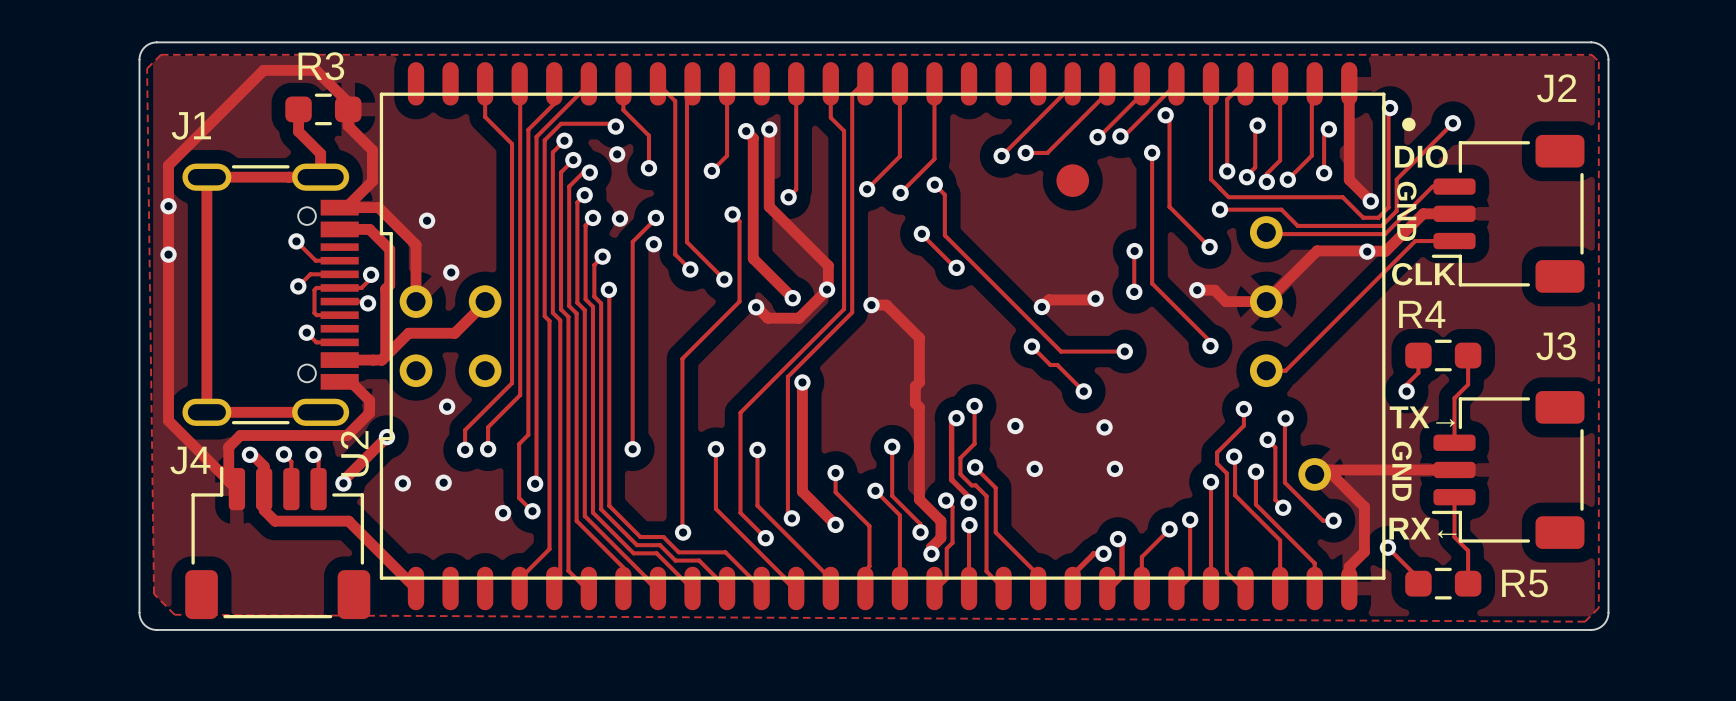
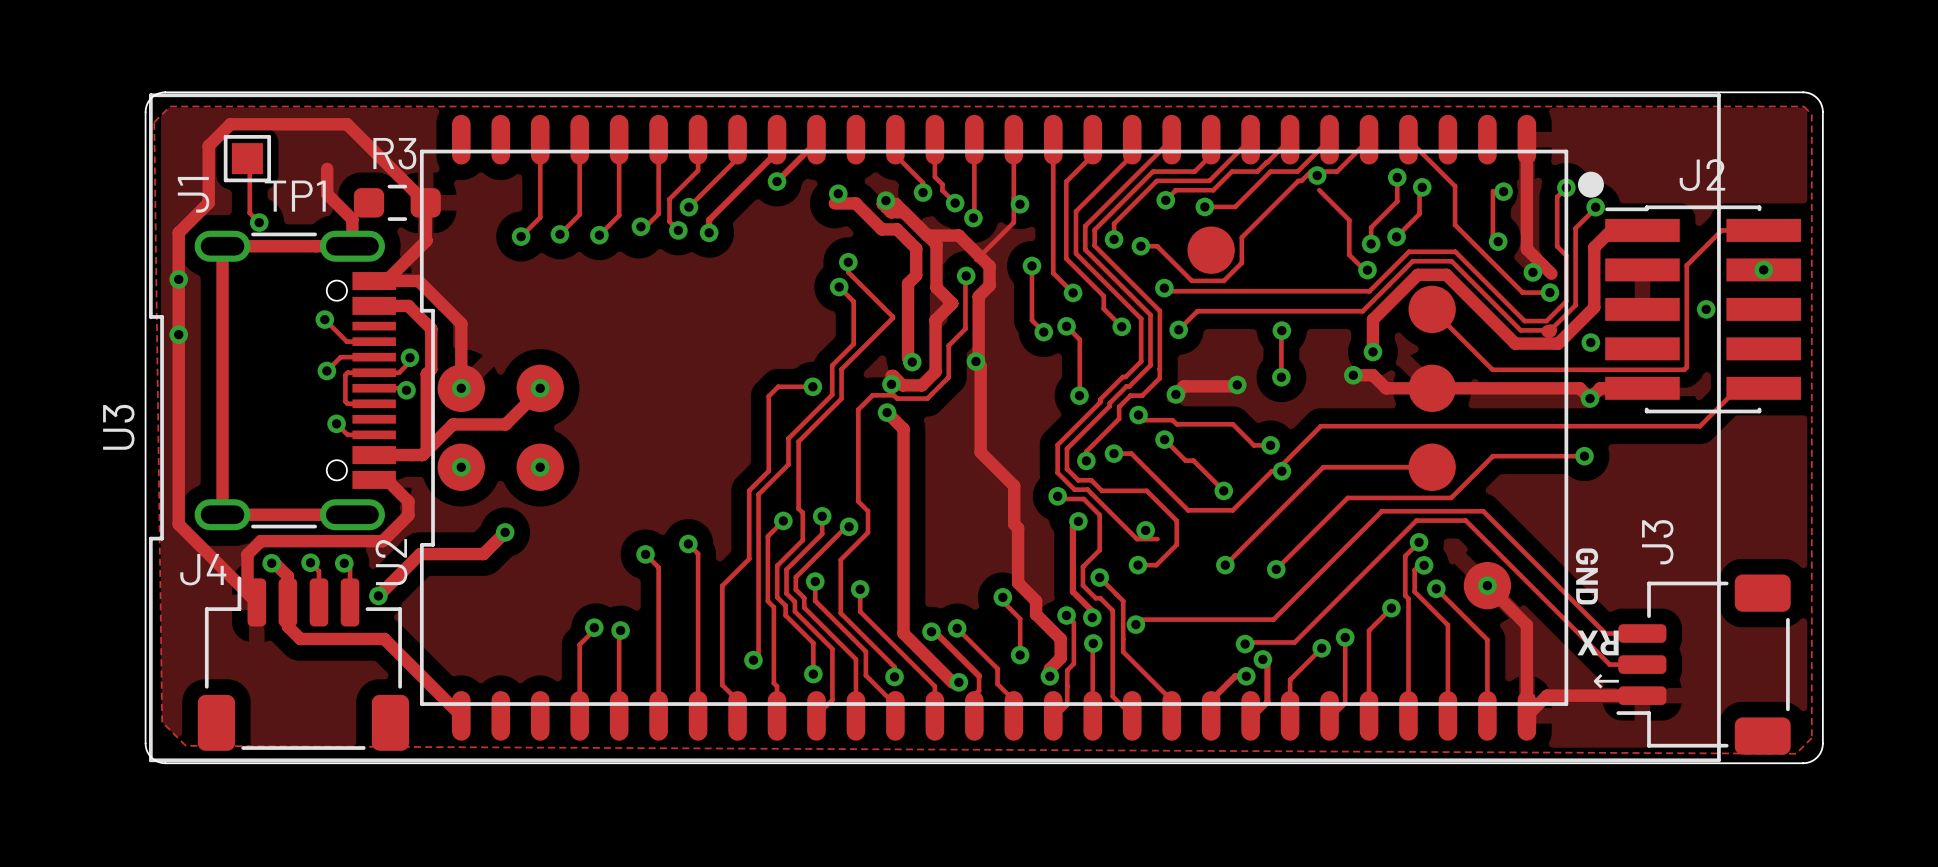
U2 footprint: [379, 62, 1386, 611] -> [419, 114, 1569, 741]
track: (263, 70) (194, 139) -> (287, 124) (230, 124) (208, 146) (208, 202)
track: (657, 83) (675, 101) (675, 254) (690, 269) -> (737, 139) (737, 158) (688, 207)
track: (692, 83) (687, 89) (687, 242) (724, 279) -> (777, 139) (777, 152) (709, 219) (709, 232)
track: (865, 83) (862, 83) (852, 94) (852, 312) (787, 376) (787, 514) (791, 518) -> (974, 139) (973, 218)
track: none -> (1092, 139) (1092, 155) (1066, 181) (1066, 258) (1103, 296) (1103, 308) (1121, 326)
track: none -> (1171, 139) (1085, 226) (1085, 249) (1150, 314) (1150, 365) (1109, 403) (1109, 406) (1066, 448) (1066, 468) (1078, 480) (1091, 480) (1101, 490) (1146, 490) (1176, 520) (1176, 544) (1156, 565) (1138, 565)
track: (1107, 83) (1107, 93) (1047, 152) (1025, 152) -> (1250, 139) (1209, 180) (1156, 180) (1114, 223) (1114, 239)
track: (1141, 83) (1141, 94) (1097, 137) -> (1290, 139) (1257, 171) (1231, 171) (1213, 190) (1175, 190) (1165, 200)
track: (1211, 83) (1211, 179) (1228, 197) (1342, 197) (1363, 217) (1378, 217) (1388, 207) (1390, 108) -> (1369, 139) (1337, 171) (1310, 171) (1301, 180) (1298, 180) (1241, 237) (1241, 262) (1223, 280) (1191, 280) (1157, 246) (1140, 246)
track: (1245, 83) (1242, 83) (1227, 99) (1227, 171) -> (1408, 139) (1455, 186) (1455, 224) (1522, 292) (1549, 292)
track: (1280, 83) (1280, 160) (1266, 173) (1266, 181) -> none
track: (1314, 83) (1311, 86) (1311, 155) (1287, 179) -> none
track: (588, 84) (536, 136) (535, 483) -> (658, 140) (658, 213) (638, 233)
track: (1072, 84) (1001, 156) -> (1211, 140) (1211, 155) (1194, 171) (1153, 171) (1094, 229) (1094, 245) (1159, 311) (1159, 378) (1142, 395) (1130, 395) (1119, 407) (1119, 418) (1086, 451) (1086, 460)
track: (727, 85) (727, 155) (711, 170) -> (816, 142) (777, 181)
track: (519, 93) (520, 395) (488, 427) (488, 449) -> (579, 150) (579, 214) (559, 234)
track: (796, 97) (796, 189) (788, 197) -> (895, 155) (923, 182) (923, 192)
track: none -> (1132, 155) (1076, 211) (1076, 253) (1141, 318) (1141, 361) (1100, 399) (1100, 402) (1057, 444) (1057, 472) (1074, 489) (1087, 489) (1136, 539) (1157, 539)
track: none -> (247, 158) (249, 160) (249, 213) (259, 222)
TP1: none -> (247, 158)
track: (348, 102) (348, 125) (372, 150) (372, 181) (346, 207) -> (383, 160) (425, 202) (426, 240) (386, 281)
track: (554, 103) (528, 129) (528, 434) (519, 444) (519, 498) (532, 511) -> (619, 162) (619, 215) (599, 235)
via position: (1390, 108) -> (1566, 187)
R3 position: (323, 109) -> (397, 202)
track: (623, 110) (648, 135) (648, 168) -> (698, 169) (669, 199) (669, 221) (678, 230)
track: (1148, 111) (1123, 136) (1120, 136) -> (1297, 171) (1270, 171) (1235, 206) (1204, 206)
track: (1165, 115) (1169, 119) (1169, 206) (1209, 246) -> none
track: (830, 116) (844, 130) (844, 309) (740, 412) (740, 512) (765, 538) -> (934, 176) (942, 184) (942, 190) (955, 203)
track: none -> (1397, 177) (1397, 201) (1371, 227) (1371, 243)
via: none -> (1397, 177)
track: (485, 117) (512, 143) (512, 383) (465, 430) (465, 449) -> (540, 177) (540, 217) (521, 236)
via: none -> (777, 181)
track: (1452, 123) (1396, 179) (1396, 210) (1381, 225) (1297, 225) (1281, 209) (1219, 209) -> none
via: (1452, 123) -> none
J1 name rotation: 0° (191, 125) -> 90° counterclockwise (193, 194)
track: (615, 126) (612, 123) (561, 123) (544, 140) (544, 316) (549, 321) (549, 549) (519, 578) -> (596, 628) (579, 644) (579, 705)
via: (615, 126) -> none
track: none -> (1566, 187) (1557, 196) (1557, 246) (1566, 255) (1566, 301) (1546, 321) (1524, 321) (1455, 251) (1409, 251) (1369, 291) (1167, 291) (1164, 288)
track: none -> (1319, 190) (1349, 220) (1349, 254) (1364, 270) (1367, 270)
track: none -> (1492, 190) (1492, 235) (1496, 238)
track: (769, 129) (769, 206) (828, 265) (828, 288) (798, 318) (767, 318) (756, 307) -> none
via position: (769, 129) -> (885, 200)
track: (1328, 129) (1324, 134) (1324, 173) -> none
via: none -> (923, 192)
track: (746, 131) (753, 138) (753, 258) (792, 298) -> none
J2 footprint: [1431, 134, 1585, 293] -> [1605, 205, 1801, 414]
via: (1120, 136) -> none
via: (1097, 137) -> none
track: none -> (834, 203) (855, 203) (881, 229) (897, 229) (916, 248) (916, 275) (908, 283) (908, 357) (912, 362)
via: none -> (955, 203)
track: (564, 140) (552, 152) (552, 312) (560, 320) (560, 572) (554, 578) -> (620, 630) (619, 705)
via: (564, 140) -> none
via: none -> (1020, 204)
via: none -> (688, 207)
via: none -> (1204, 206)
via: none -> (1595, 207)
track: none -> (904, 212) (891, 212) (885, 207) (885, 200) (882, 204) (895, 204) (936, 244) (936, 287) (952, 303) (935, 320) (935, 371) (921, 385) (902, 385) (891, 375)
track: (1255, 148) (1255, 167) (1246, 177) -> (1419, 213) (1396, 236)
via: none -> (973, 218)
via position: (1025, 152) -> (1165, 200)
track: (1152, 152) (1152, 283) (1210, 341) (1210, 346) -> none
via: (1152, 152) -> none
via: (617, 154) -> none
via: none -> (259, 222)
via position: (1001, 156) -> (1114, 239)
text: DIO (1421, 156) -> none
track: (934, 159) (900, 192) -> (1053, 225) (1053, 273) (1073, 292)
track: (573, 160) (561, 172) (561, 309) (568, 316) (568, 570) (586, 588) (588, 588) -> (645, 554) (658, 567) (658, 715)
via: none -> (678, 230)
track: none -> (1642, 230) (1611, 230) (1594, 247) (1594, 307) (1558, 343) (1515, 343) (1446, 274) (1417, 274) (1372, 319) (1372, 351)
via: none -> (709, 232)
via: none -> (559, 234)
via: none -> (599, 235)
via: none -> (521, 236)
via: (648, 168) -> none
via: none -> (1396, 236)
via: (711, 170) -> none
via: (1227, 171) -> none
track: (589, 172) (583, 172) (569, 186) (569, 306) (576, 313) (576, 520) (623, 567) -> (688, 544) (698, 553) (698, 692)
via: (589, 172) -> none
via: none -> (1371, 243)
via: none -> (1140, 246)
via: (1246, 177) -> none
via: (1287, 179) -> none
via: (1266, 181) -> none
track: (934, 184) (944, 194) (944, 235) (1039, 329) -> (1138, 415) (1143, 420) (1172, 420)
via: (934, 184) -> none
track: (1454, 186) (1432, 186) (1385, 234) (1267, 234) -> (1763, 230) (1721, 230) (1686, 265) (1686, 367) (1684, 369) (1492, 369) (1434, 311)
via position: (867, 189) -> (966, 275)
track: none -> (848, 262) (848, 272) (892, 317) (841, 369) (841, 398) (798, 441) (798, 508) (802, 512) (802, 540) (777, 565) (777, 597) (785, 605) (785, 615) (813, 643) (813, 674)
via: none -> (848, 262)
via position: (900, 192) -> (1031, 265)
track: none -> (1031, 265) (1031, 320) (1043, 332)
track: (584, 195) (577, 202) (577, 302) (584, 310) (584, 516) (655, 588) (657, 588) -> none
via: (584, 195) -> none
via: (788, 197) -> none
via: none -> (1763, 269)
via position: (1370, 201) -> (1532, 272)
track: none -> (966, 275) (965, 328) (948, 345) (948, 377) (927, 398) (897, 398) (893, 395) (872, 395) (858, 409) (858, 501) (868, 511) (868, 532) (840, 559) (840, 613) (894, 666) (894, 676)
via position: (1219, 209) -> (1367, 270)
text: GND (1406, 211) -> none
track: none -> (839, 287) (853, 301) (853, 344) (832, 365) (832, 394) (788, 438) (788, 464) (758, 494) (758, 655) (753, 660)
via: none -> (1164, 288)
track: (1454, 213) (1423, 213) (1385, 251) (1370, 251) -> (1595, 207) (1575, 228) (1575, 305) (1550, 330)
track: (732, 214) (739, 221) (739, 301) (682, 358) (683, 532) (678, 531) -> none
via position: (732, 214) -> (839, 287)
track: (592, 217) (585, 225) (585, 299) (592, 306) (592, 512) (633, 553) (656, 553) (692, 588) -> (783, 520) (767, 536) (767, 601) (773, 607) (773, 683) (777, 686) (777, 715)
via: (592, 217) -> none
track: (655, 217) (632, 241) (632, 449) -> none
via: (655, 217) -> none
via: none -> (1549, 292)
via: (619, 218) -> none
via: none -> (1073, 292)
via: (427, 220) -> none
via: none -> (1706, 309)
via: (921, 233) -> none
track: (921, 234) (956, 267) -> none
track: (1454, 241) (1415, 241) (1285, 370) (1266, 370) -> (1225, 565) (1323, 467) (1432, 467)
via: (653, 244) -> none
via position: (1209, 246) -> (1372, 351)
track: none -> (1066, 326) (1079, 339) (1079, 395)
via: none -> (1066, 326)
via: none -> (1121, 326)
track: none -> (1178, 329) (1197, 311) (1362, 311) (1412, 261) (1451, 261) (1520, 330)
via: none -> (1178, 329)
track width: thick (1317, 250) (1370, 250) -> thin (1490, 330) (1550, 330)
track: (1343, 250) (1317, 250) (1266, 301) -> (1642, 388) (1600, 388) (1590, 398) (1579, 388) (1432, 388)
via: (1367, 251) -> none
via: none -> (1043, 332)
track: (602, 256) (594, 264) (594, 296) (601, 303) (601, 509) (637, 545) (660, 545) (675, 560) (699, 560) (727, 588) -> (822, 516) (822, 534) (786, 569) (786, 593) (794, 601) (794, 611) (832, 648) (832, 699) (816, 715)
via: (602, 256) -> none
via: none -> (1590, 342)
via: (956, 267) -> none
via: (690, 269) -> none
via: (451, 272) -> none
text: CLK (1423, 274) -> none
via: none -> (975, 361)
via: (724, 279) -> none
track: (608, 289) (609, 505) (640, 537) (663, 537) (678, 552) (725, 552) (761, 588) -> (849, 526) (846, 526) (795, 577) (795, 589) (804, 598) (804, 607) (855, 659) (855, 715)
via: (608, 289) -> none
via position: (827, 289) -> (912, 362)
track: none -> (812, 386) (778, 386) (768, 396) (768, 471) (749, 490) (749, 558) (722, 585) (722, 685) (737, 700)
via: none -> (812, 386)
via: none -> (461, 388)
via: none -> (540, 388)
track: none -> (1763, 388) (1737, 388) (1699, 426) (1320, 426) (1281, 465) (1281, 471) (1271, 471) (1232, 510) (1188, 510) (1131, 453) (1113, 453)
track: (871, 305) (886, 305) (919, 337) (919, 382) (915, 386) (915, 403) (919, 407) (919, 487) -> (927, 235) (958, 235) (989, 266) (989, 285) (978, 296) (978, 358) (975, 361) (980, 366) (980, 452) (1014, 485) (1014, 524) (1018, 528) (1018, 582) (1036, 600)
via: (871, 305) -> none
via: (756, 307) -> none
via: none -> (1079, 395)
via: none -> (1590, 398)
track: none -> (887, 412) (903, 429) (903, 633) (952, 682) (958, 682)
via: none -> (887, 412)
via: none -> (1138, 415)
track: (1042, 333) (1061, 351) (1110, 351) -> (1176, 424) (1232, 424) (1253, 445)
U3: none -> (934, 427)
via: (1210, 346) -> none
J3 name rotation: 0° (1556, 346) -> 90° counterclockwise (1657, 542)
J3 name position: J3 (1556, 346) -> J3 (1657, 542)
track: (1418, 355) (1418, 372) (1406, 384) (1406, 391) -> none
R4: (1443, 355) -> none
track: (1468, 355) (1468, 384) (1454, 398) (1454, 442) -> none
via: none -> (1113, 453)
track: none -> (1584, 456) (1492, 456) (1451, 497) (1347, 497) (1276, 569)
via: none -> (1086, 460)
via: none -> (461, 467)
via: none -> (540, 467)
via: none -> (1281, 471)
track: (802, 382) (802, 491) (835, 524) -> none
via: (802, 382) -> none
via position: (1406, 391) -> (1584, 456)
via: none -> (1057, 496)
track: (974, 405) (974, 443) -> (1057, 496) (1060, 498) (1083, 498) (1099, 514) (1099, 550)
via: (974, 405) -> none
via: (447, 406) -> none
track: (1243, 409) (1243, 425) (1217, 452) (1217, 463) (1226, 473) (1226, 572) (1242, 588) (1245, 588) -> (1419, 542) (1405, 556) (1405, 595) (1408, 598) (1408, 715)
via: (1243, 409) -> none
via: none -> (822, 516)
via: none -> (783, 520)
text: TX→ (1422, 417) -> none
track: (1285, 418) (1284, 482) (1322, 520) (1333, 520) -> none
via: (1285, 418) -> none
via: none -> (849, 526)
via: none -> (505, 532)
via: (1104, 427) -> none
track: (386, 437) (343, 480) (343, 483) -> (505, 532) (483, 554) (420, 554) (378, 595)
via: (386, 437) -> none
track: (1267, 439) (1275, 447) (1275, 499) (1283, 507) -> none
via position: (1267, 439) -> (1419, 542)
track: (892, 446) (892, 495) (920, 524) (920, 532) -> none
via: (892, 446) -> none
via: none -> (645, 554)
via: (465, 449) -> none
via: (488, 449) -> none
via position: (632, 449) -> (688, 544)
track: (715, 449) (715, 508) (793, 588) (796, 588) -> (815, 581) (815, 600) (865, 651) (865, 675) (895, 705) (895, 715)
via: (715, 449) -> none
track: (757, 449) (757, 505) (830, 578) -> (860, 589) (860, 611) (934, 686) (934, 705)
via: (757, 449) -> none
via: none -> (1138, 565)
via: none -> (1225, 565)
track: (1234, 456) (1235, 495) (1280, 540) -> (1424, 565) (1419, 565) (1414, 570) (1414, 591) (1447, 625) (1447, 660)
via: (1234, 456) -> none
via: none -> (1424, 565)
via: (1034, 468) -> none
via position: (1114, 468) -> (1276, 569)
track: (1454, 469) (1328, 469) (1324, 474) -> none
J3 position: (1508, 469) -> (1703, 664)
via: none -> (815, 581)
track: (1255, 471) (1255, 504) (1314, 563) -> (1436, 588) (1487, 639) (1487, 687)
via: (1255, 471) -> none
track: (835, 472) (835, 492) (869, 526) (869, 553) -> (931, 631) (934, 631) (979, 675)
via: (835, 472) -> none
track: (1314, 474) (1331, 474) (1364, 506) (1364, 551) (1349, 567) -> (1487, 585) (1526, 625) (1526, 691)
via: none -> (1487, 585)
via: none -> (860, 589)
via: none -> (1436, 588)
via: (443, 482) -> none
track: (1211, 482) (1211, 513) -> (1391, 608) (1369, 630)
via: (1211, 482) -> none
via: (402, 483) -> none
via: (535, 483) -> none
track: none -> (1002, 597) (1002, 601) (1020, 618) (1020, 655)
track: (875, 490) (899, 515) (899, 574) -> (957, 628) (997, 668) (997, 684) (1013, 700)
via position: (875, 490) -> (1002, 597)
via: none -> (1391, 608)
track: (1454, 497) (1454, 537) (1468, 550) (1468, 583) -> none
via: (1283, 507) -> none
track: none -> (1135, 624) (1140, 619) (1273, 619) (1381, 511) (1483, 511) (1605, 633) (1642, 633)
via: none -> (1135, 624)
via: none -> (957, 628)
via: (503, 513) -> none
via: none -> (620, 630)
via: none -> (931, 631)
via: (791, 518) -> none
via: (1333, 520) -> none
via: (835, 524) -> none
track: none -> (1245, 644) (1246, 642) (1294, 642) (1416, 520) (1465, 520) (1609, 664) (1642, 664)
via: none -> (1245, 644)
text: RX← (1422, 528) -> RX (1598, 642)
via position: (683, 532) -> (753, 660)
via position: (920, 532) -> (1020, 655)
via: (765, 538) -> none
track: (1387, 547) (1418, 578) (1418, 583) -> none
via: (1387, 547) -> none
via: none -> (813, 674)
via: none -> (894, 676)
text: none -> → (1606, 681)
via: none -> (958, 682)
track: none -> (1642, 695) (1547, 695) (1526, 715)
R5: (1443, 583) -> none

